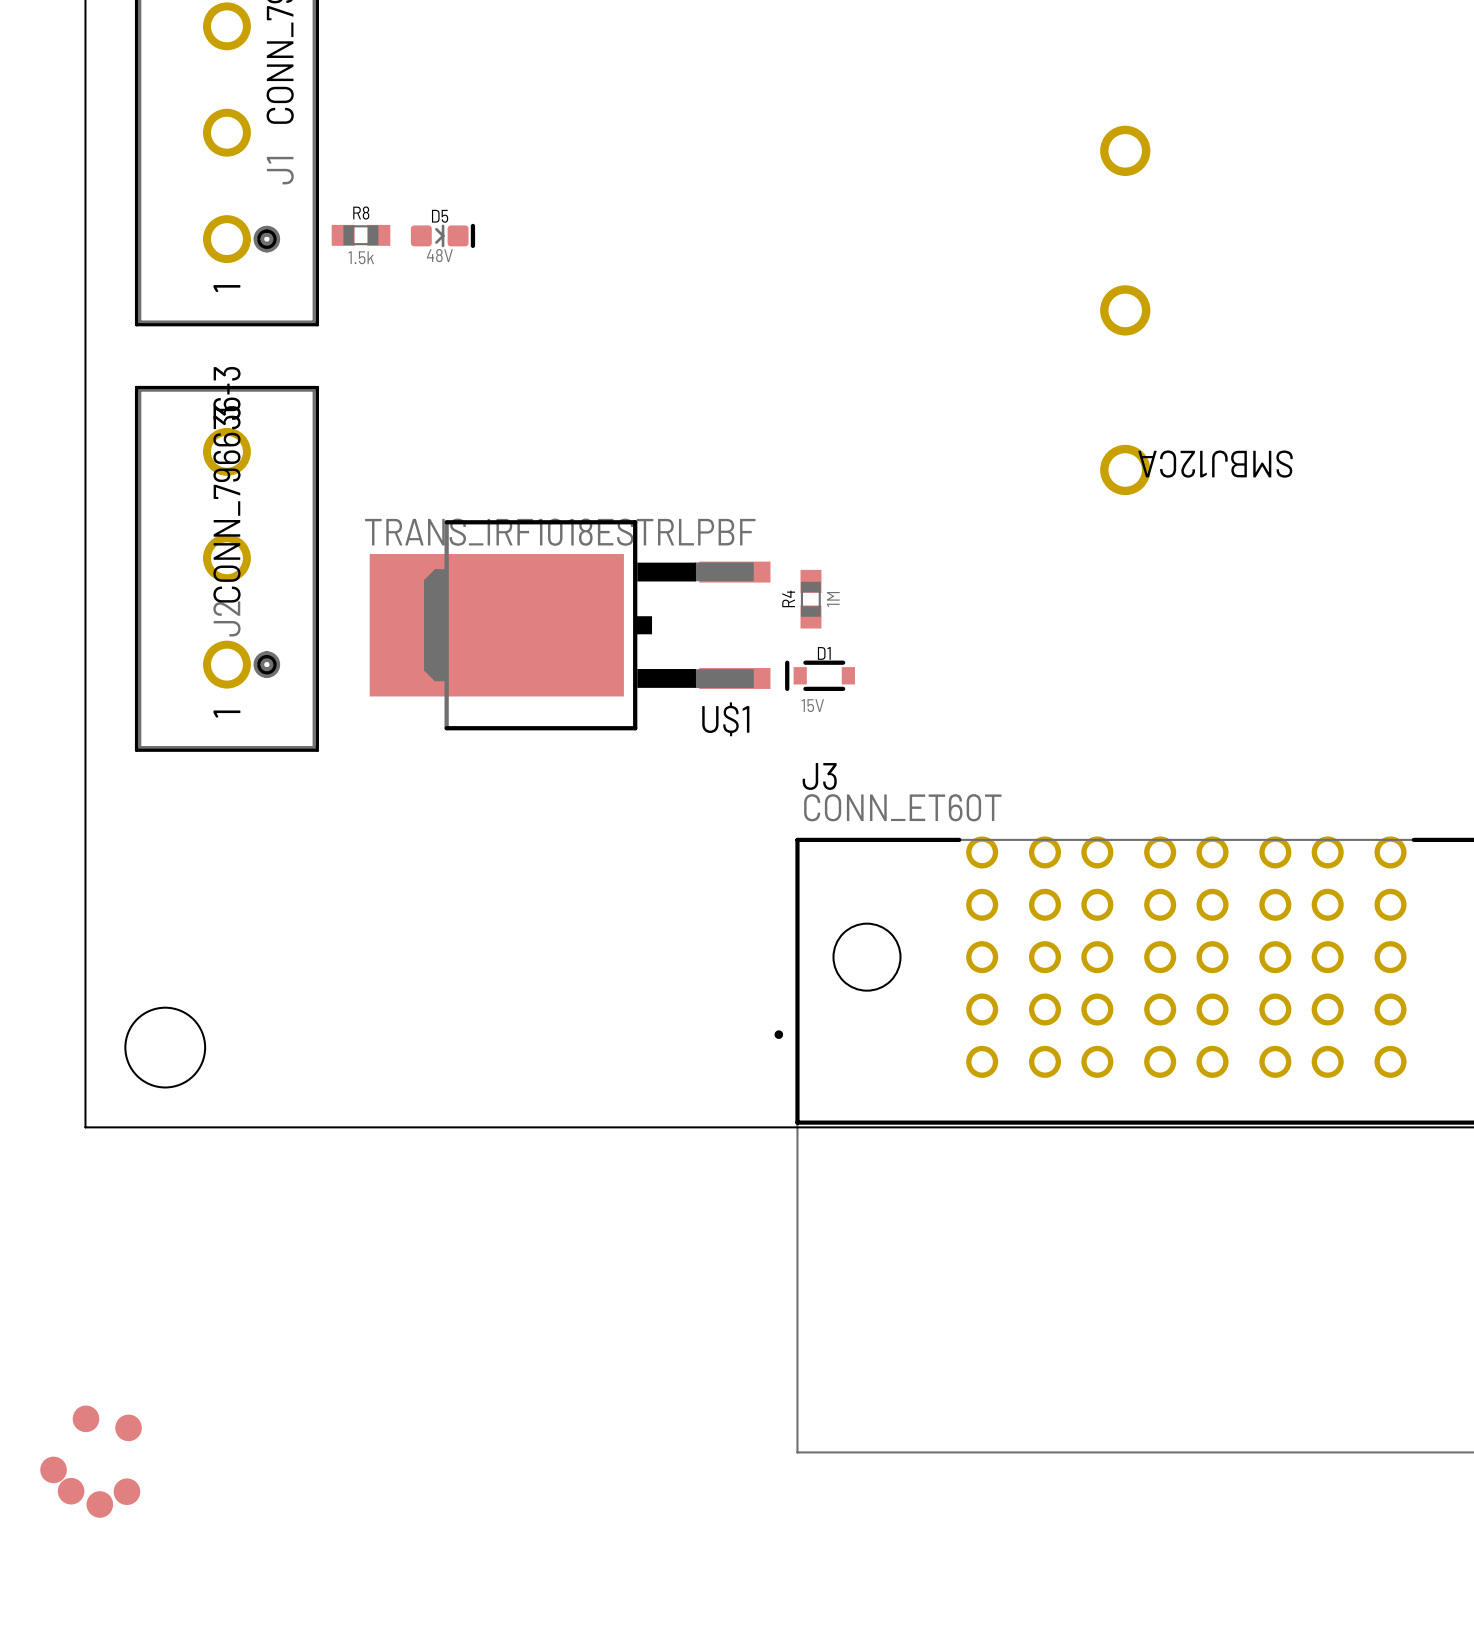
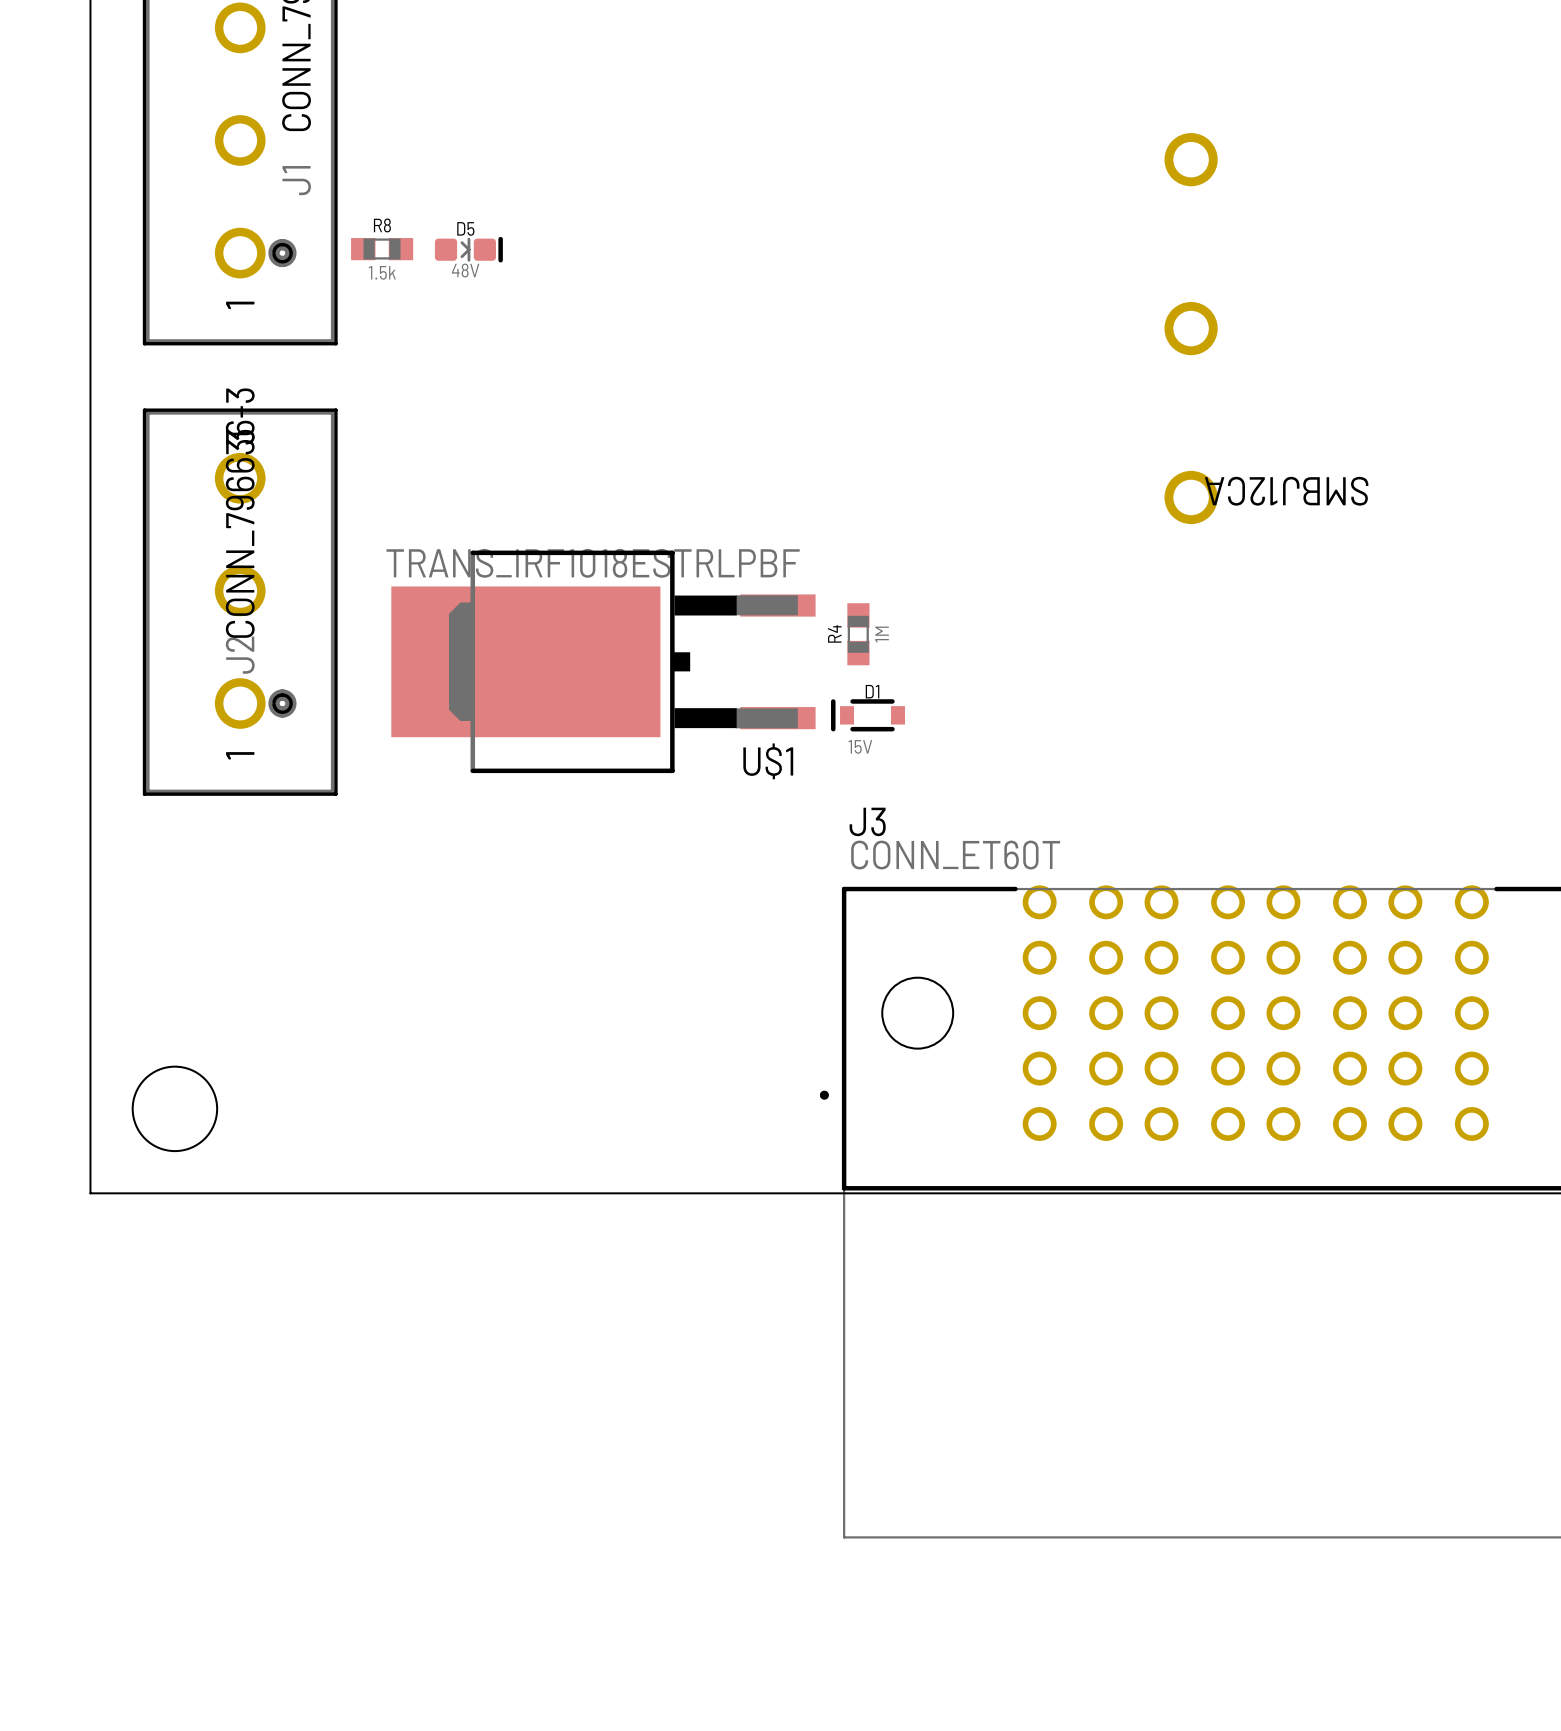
part: (86, 1418) -> none
part: (128, 1427) -> none
part: (53, 1469) -> none
part: (71, 1491) -> none
part: (126, 1491) -> none
part: (99, 1504) -> none

